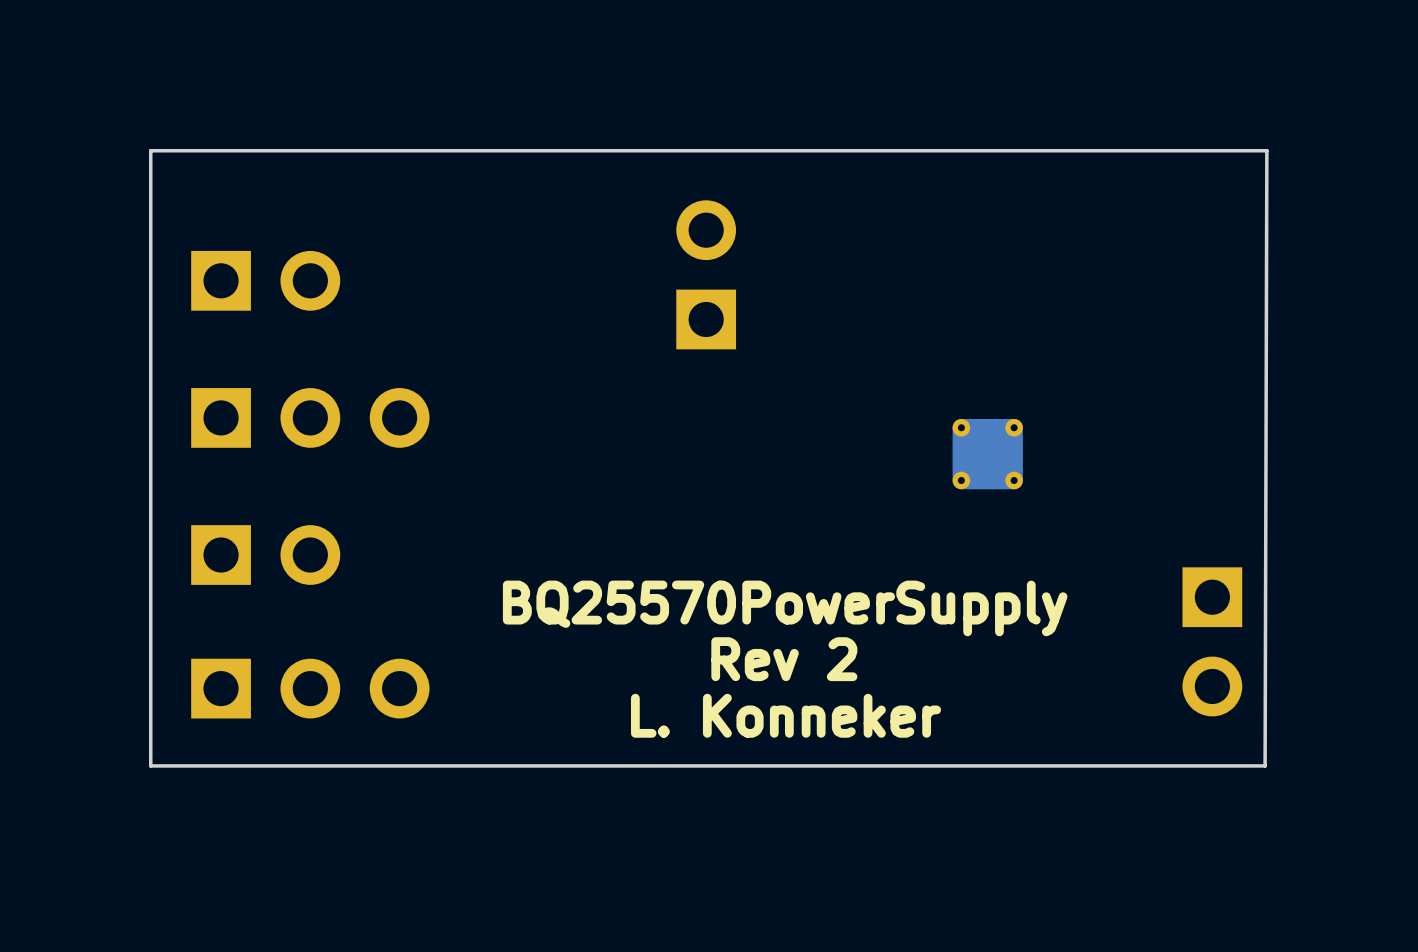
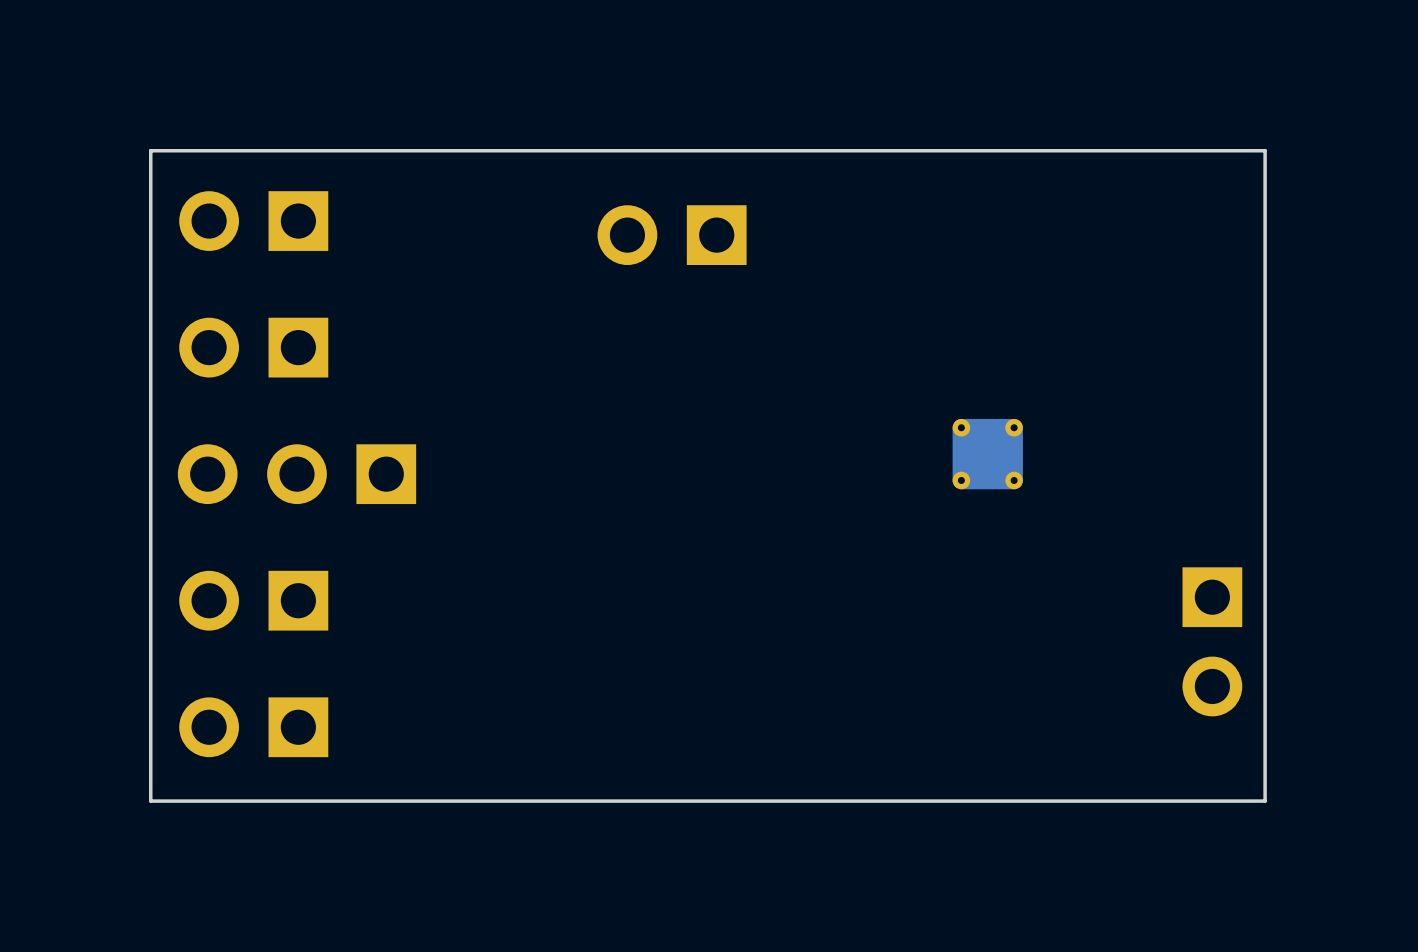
board edge: (1265, 150) (1266, 150) (1265, 765) (150, 765) -> (1265, 150) (1265, 801) (150, 801) (150, 765)
part: none -> (253, 221)
part rotation: 0° (706, 274) -> 90° counterclockwise (672, 235)
part: (265, 280) -> none
part: none -> (253, 347)
part rotation: 0° (310, 417) -> 180° (296, 474)
part rotation: 0° (265, 555) -> 180° (253, 600)
text: BQ25570PowerSupply (785, 608) -> none
text: Rev 2 (784, 659) -> none
part: (310, 688) -> none
text: L. Konneker (786, 715) -> none
part: none -> (253, 727)

